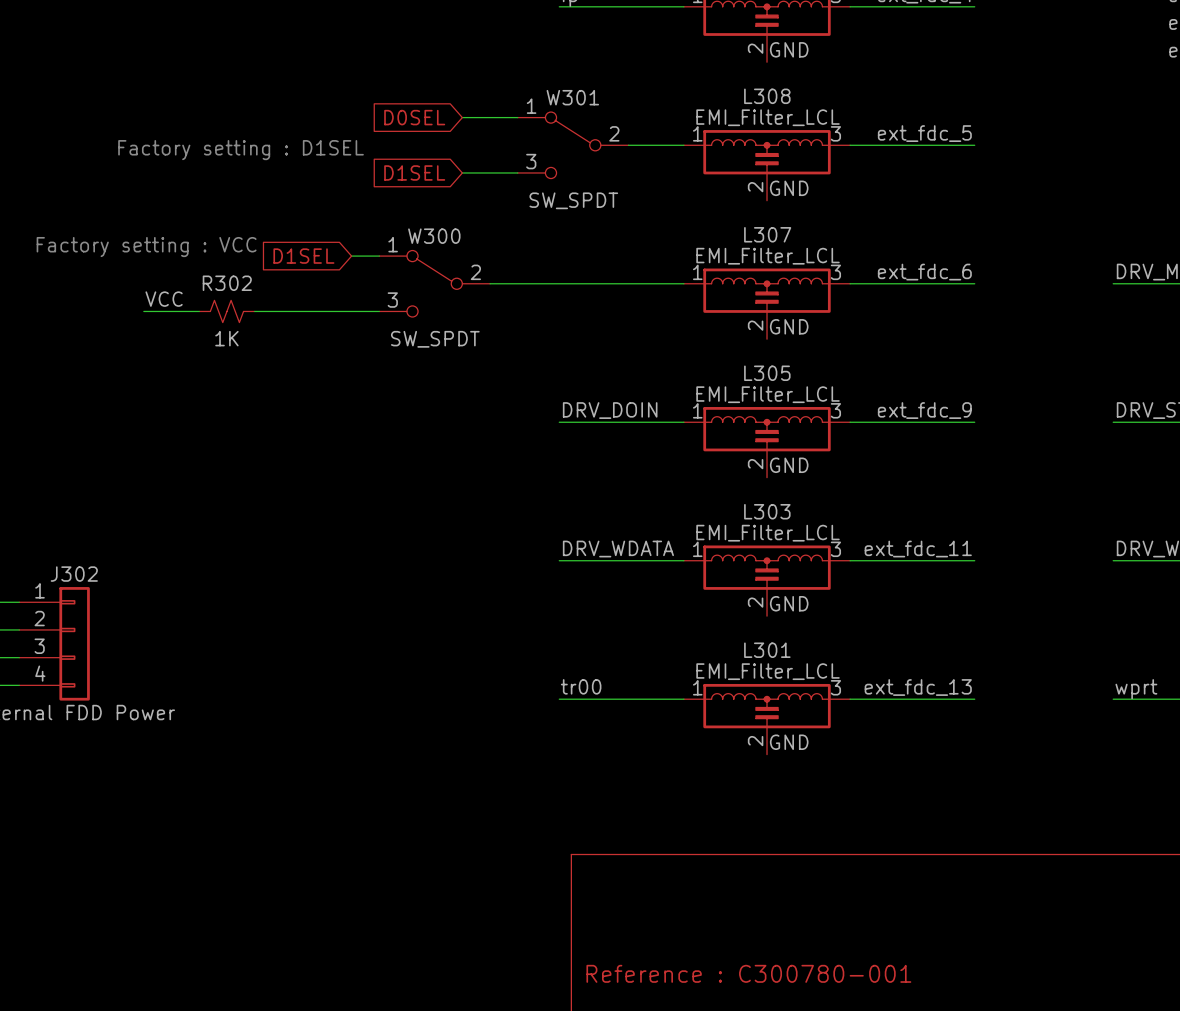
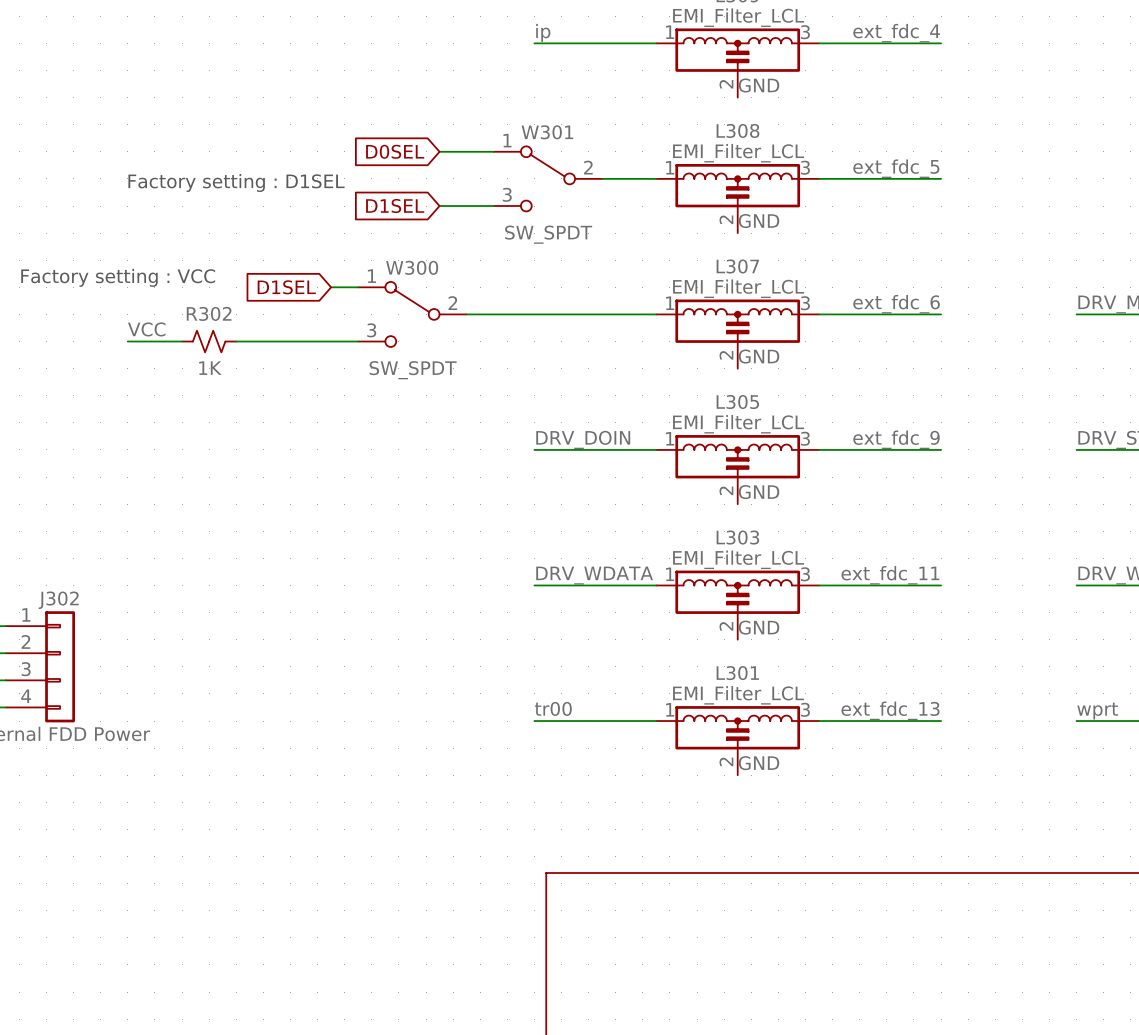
title block: Reference : C300780-001 (748, 973) -> none

